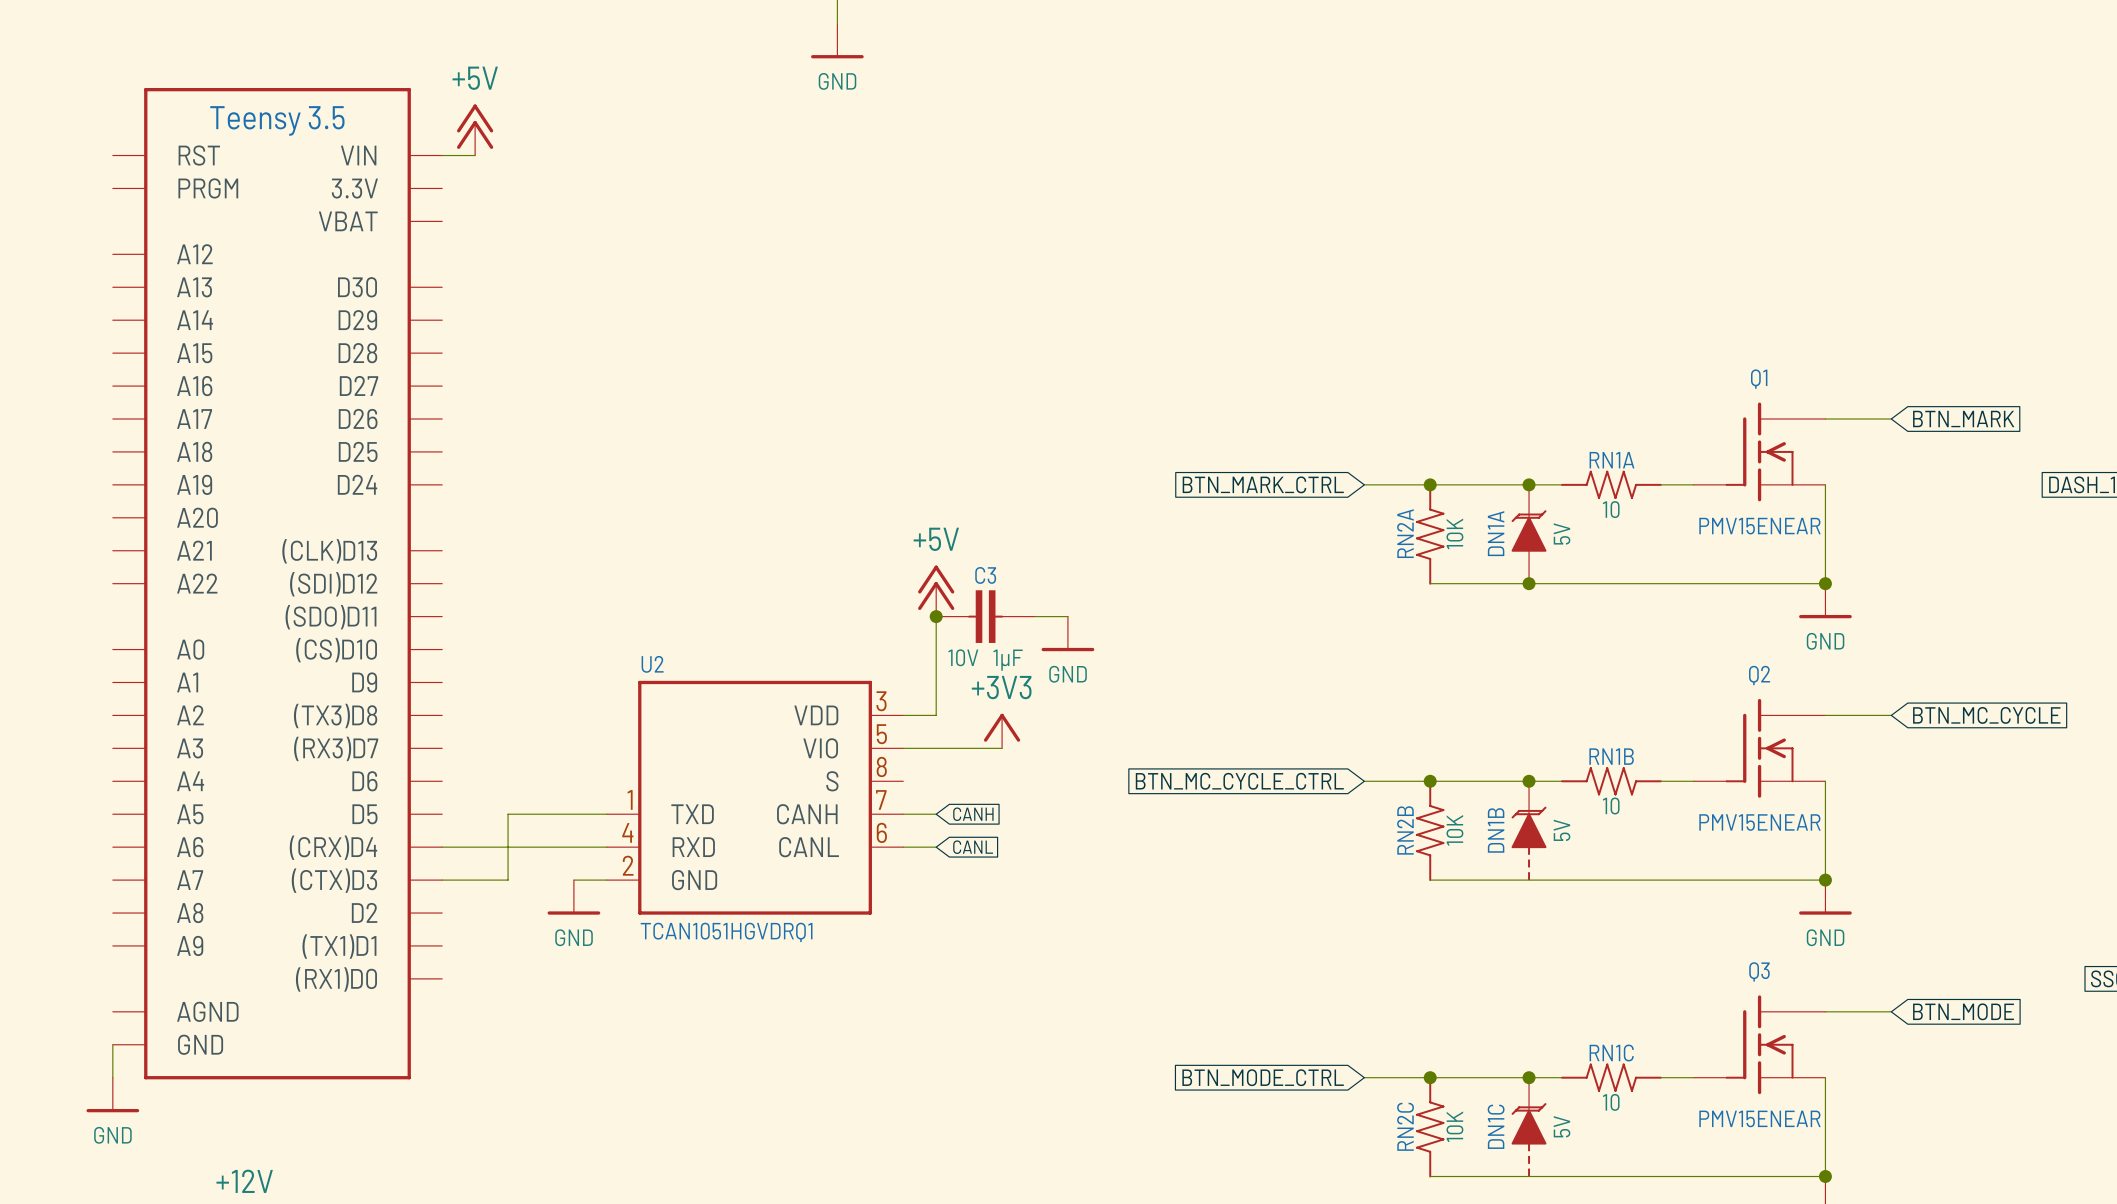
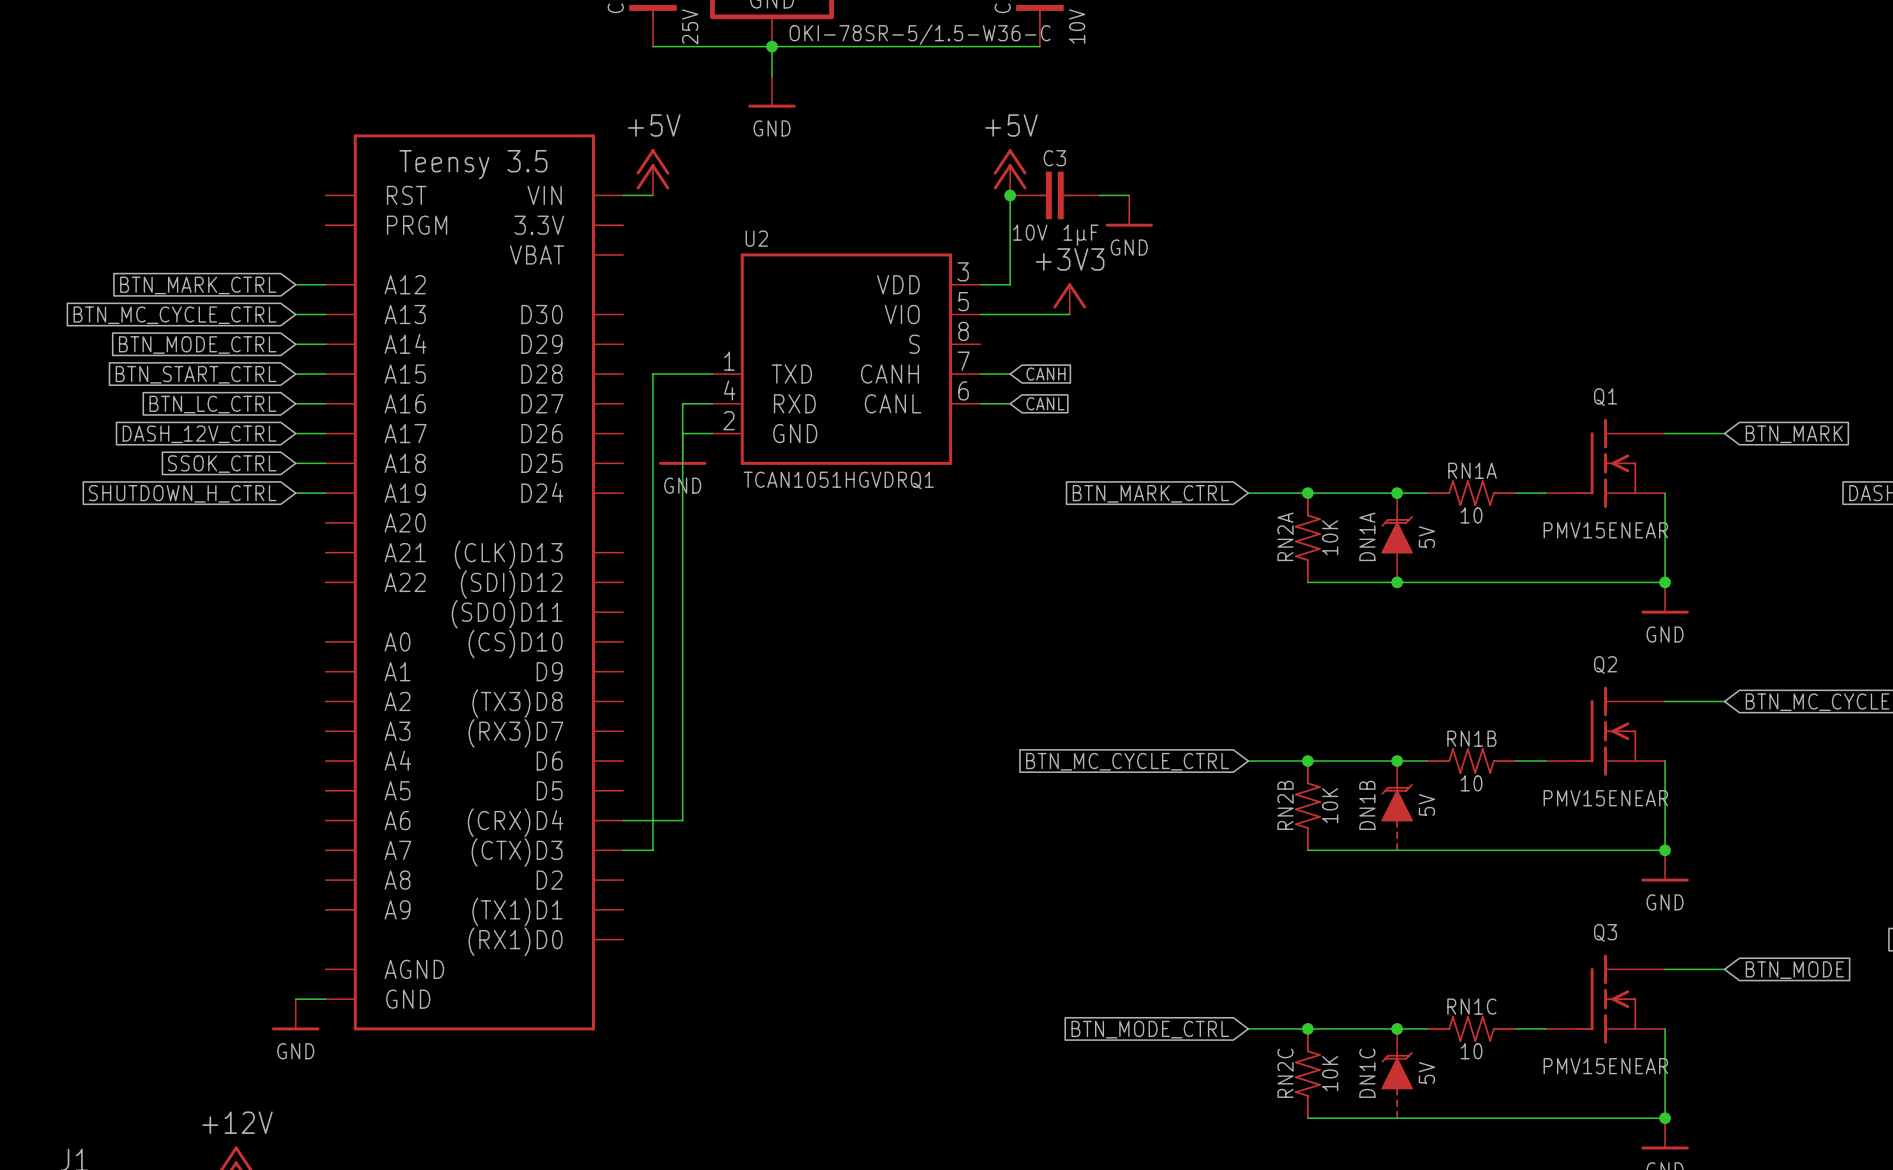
power symbol position: +5V (475, 130) -> +5V (652, 172)
power symbol: none -> +5V (1010, 172)
wire: (442, 155) (475, 155) -> (295, 284) (325, 284)
wire: none -> (623, 195) (652, 195)
wire: none -> (1010, 195) (1010, 284) (980, 284)
junction: none -> (1010, 195)
wire: none -> (1099, 195) (1129, 195)
power symbol: none -> GND (1129, 211)
global label: none -> BTN_MARK_CTRL (198, 285)
power symbol: none -> +3V3 (1069, 298)
global label: none -> BTN_MC_CYCLE_CTRL (175, 315)
wire: none -> (295, 314) (325, 314)
wire: none -> (980, 314) (1069, 314)
global label: none -> BTN_MODE_CTRL (197, 344)
wire: none -> (295, 344) (325, 344)
global label: none -> BTN_START_CTRL (196, 374)
wire: none -> (295, 374) (325, 374)
wire: none -> (712, 374) (652, 374) (652, 850) (623, 850)
wire: none -> (980, 374) (1010, 374)
global label: none -> CANH (1046, 374)
global label: none -> BTN_LC_CTRL (212, 404)
wire: none -> (295, 403) (325, 403)
wire: none -> (712, 403) (682, 403) (682, 820) (623, 820)
global label: none -> CANL (1045, 403)
global label: none -> DASH_12V_CTRL (199, 434)
wire: none -> (295, 433) (325, 433)
wire: none -> (682, 433) (712, 433)
power symbol: none -> GND (682, 449)
global label: none -> SSOK_CTRL (222, 464)
wire: none -> (295, 463) (325, 463)
global label: none -> SHUTDOWN_H_CTRL (182, 493)
wire: none -> (295, 493) (325, 493)
part position: (277, 583) -> (474, 582)
power symbol: +5V (936, 591) -> none
wire: (936, 616) (936, 715) (903, 715) -> none
junction: (936, 616) -> none
C3 position: (985, 616) -> (1054, 195)
wire: (1035, 616) (1067, 616) -> (980, 403) (1010, 403)
power symbol: GND (1067, 633) -> none
power symbol: +3V3 (1002, 731) -> none
wire: (903, 748) (1002, 748) -> none
U2 position: (755, 797) -> (846, 359)
wire: (606, 814) (508, 814) (508, 880) (442, 880) -> none
wire: (903, 814) (936, 814) -> none
global label: CANH (973, 814) -> none
wire: (442, 847) (606, 847) -> none
wire: (903, 847) (936, 847) -> none
global label: CANL (973, 847) -> none
wire: (573, 880) (606, 880) -> (295, 999) (325, 999)
power symbol: GND (573, 897) -> none
wire: (112, 1044) (112, 1077) -> none
power symbol: none -> GND (295, 1014)
power symbol: GND (112, 1094) -> none

